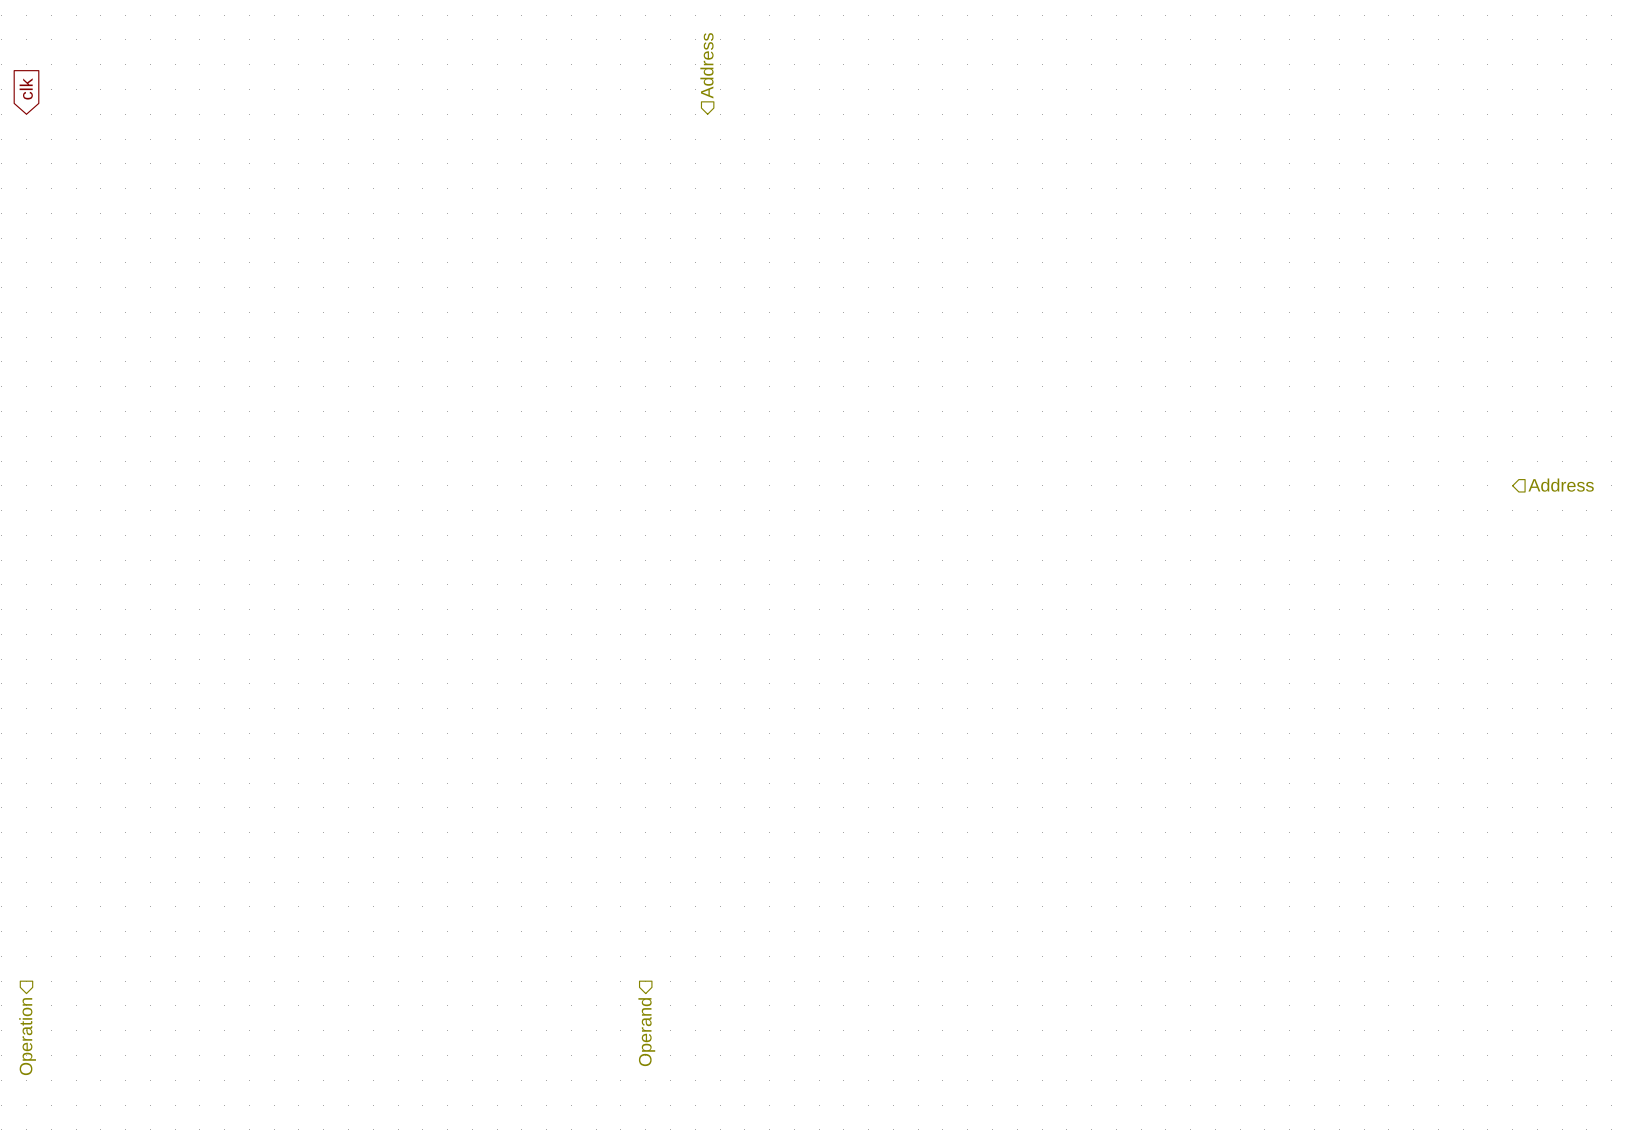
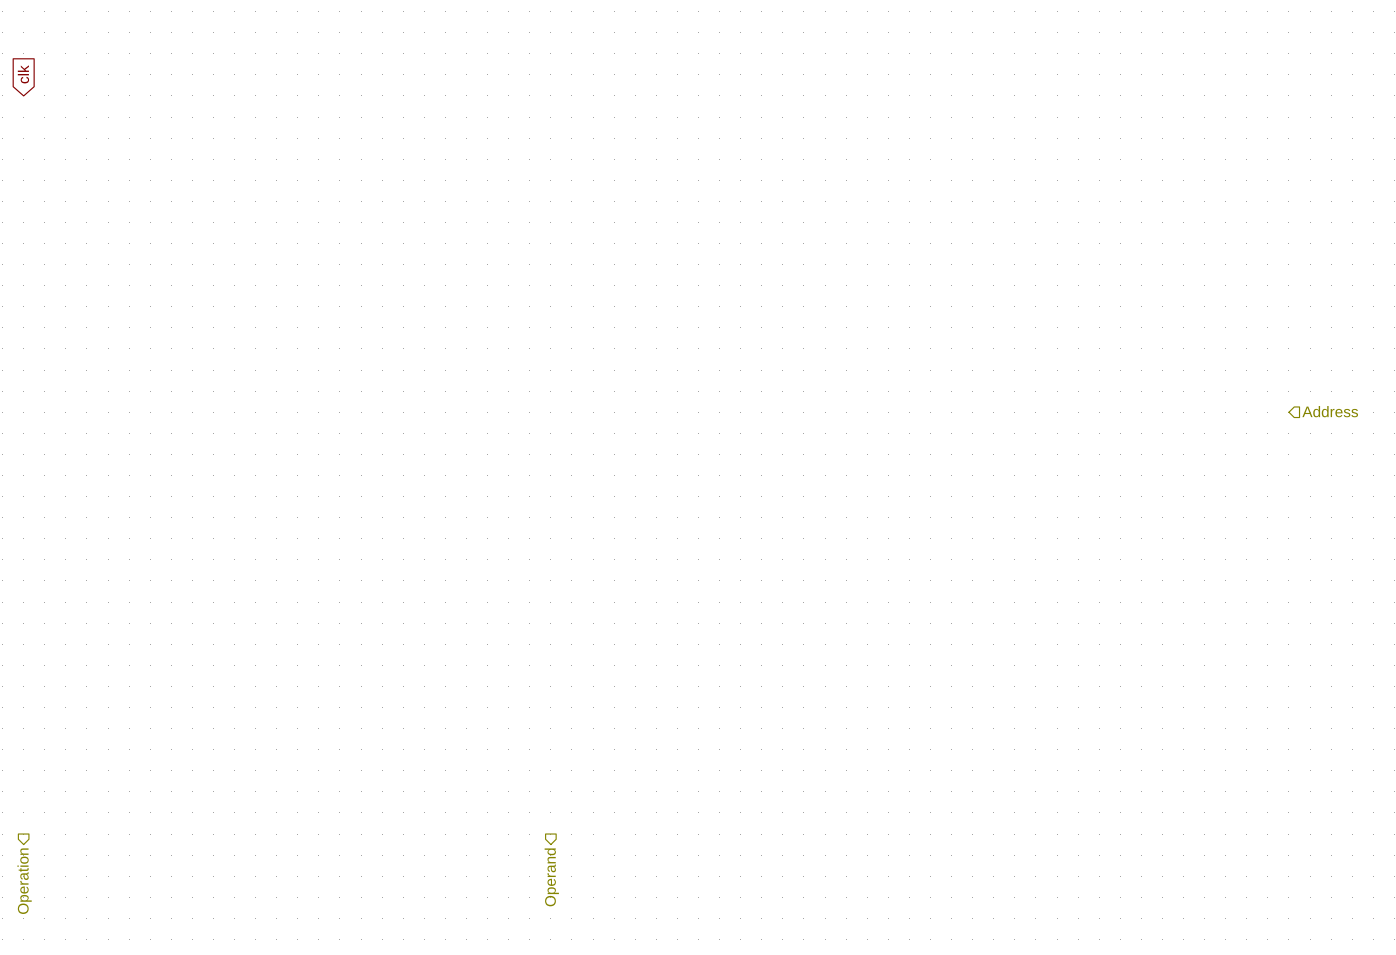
hierarchical label: Address (706, 65) -> none

